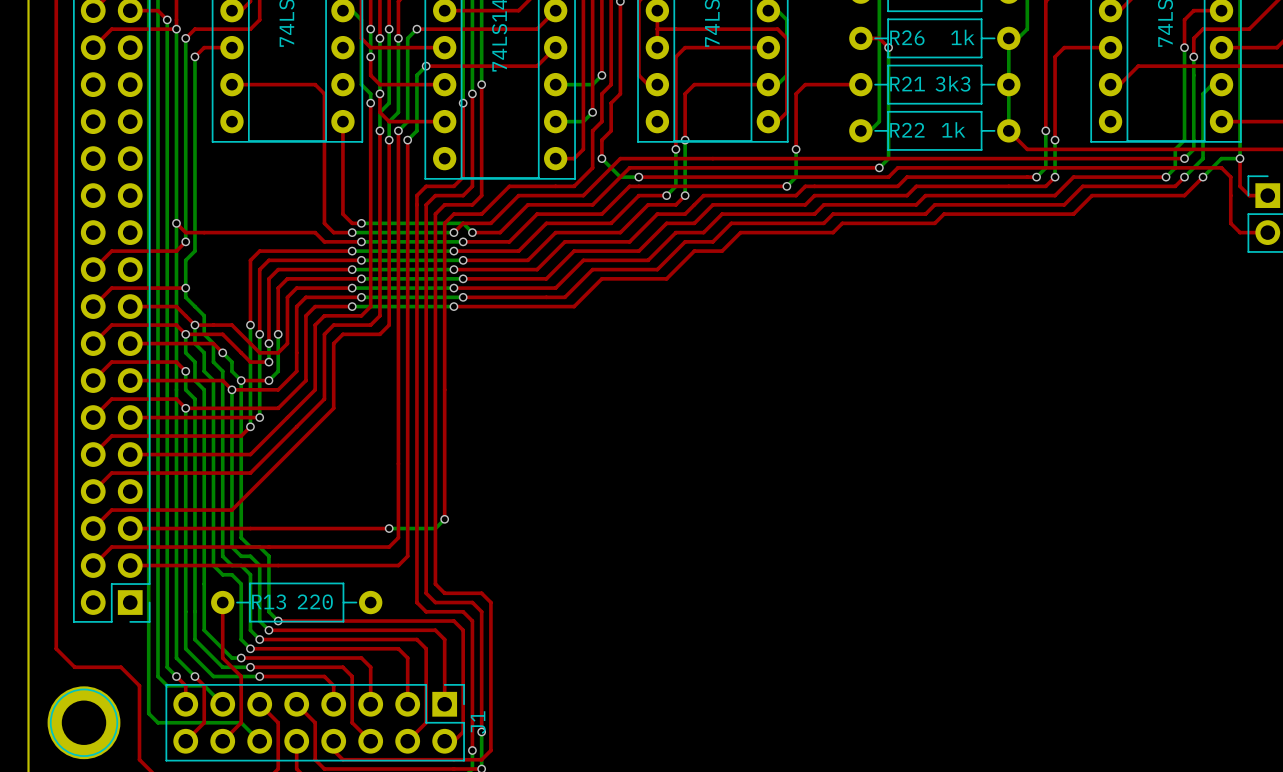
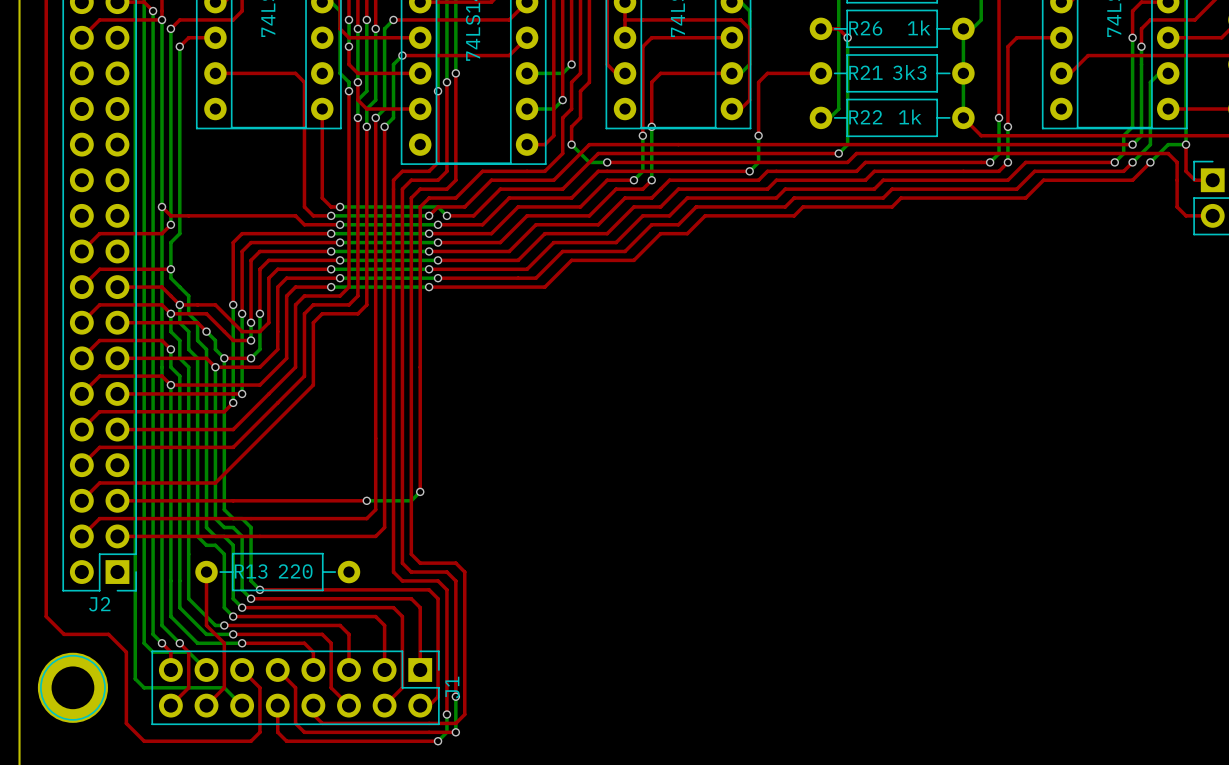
J2 name: none -> J2 (99, 604)

